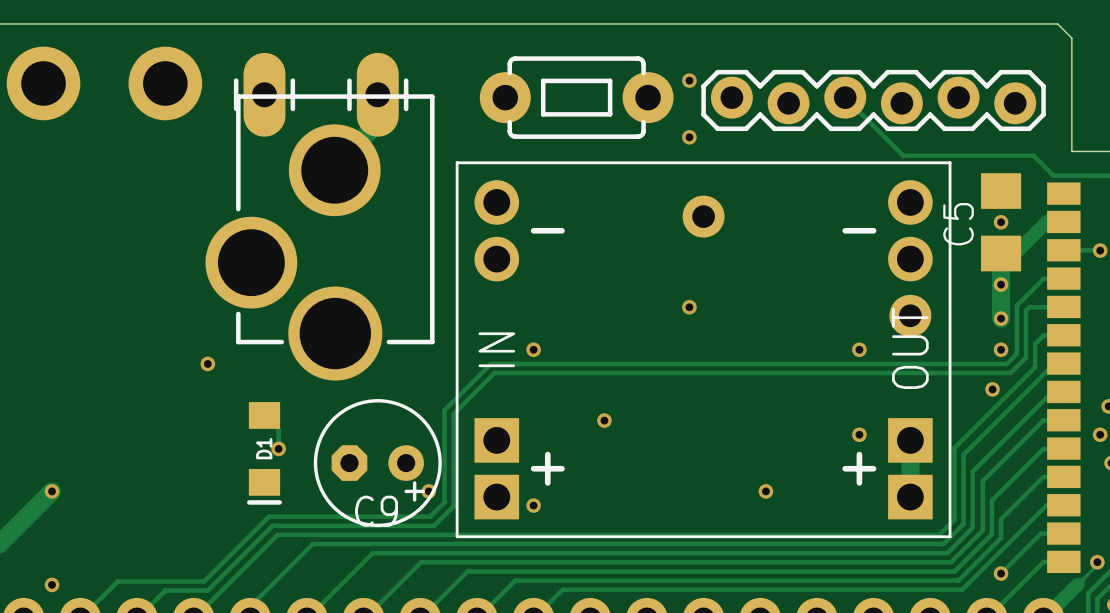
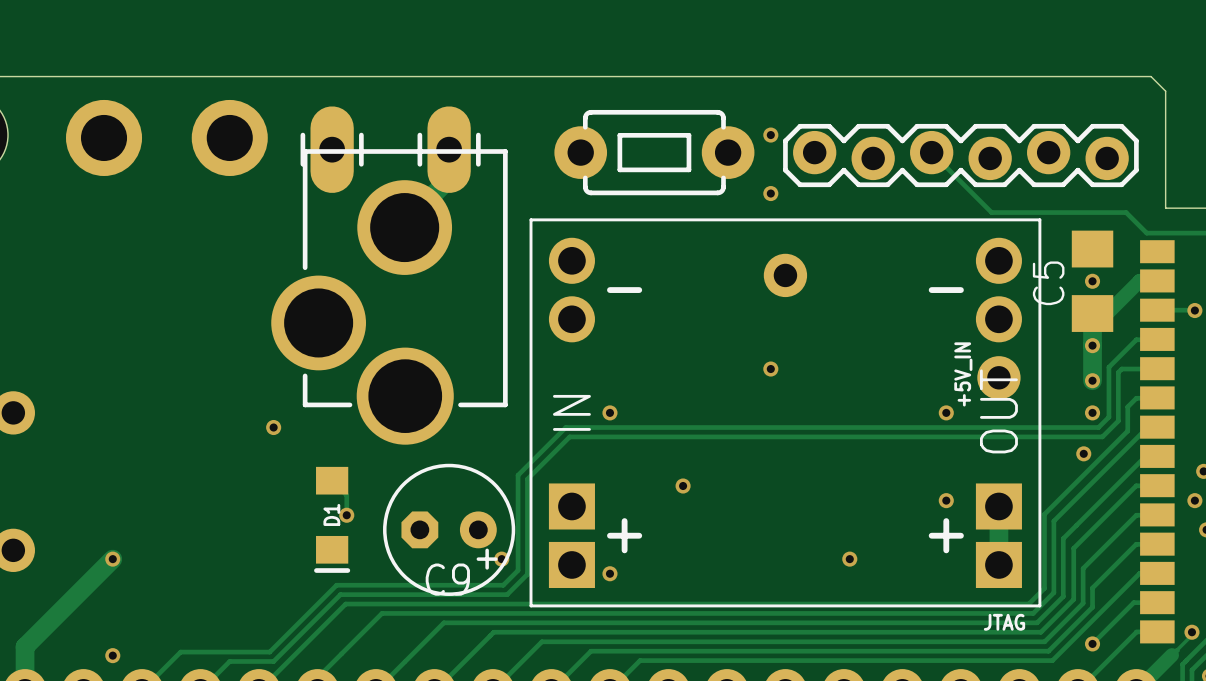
+5V_IN name: none -> +5V_IN (963, 374)
JTAG name: none -> JTAG (1004, 622)

